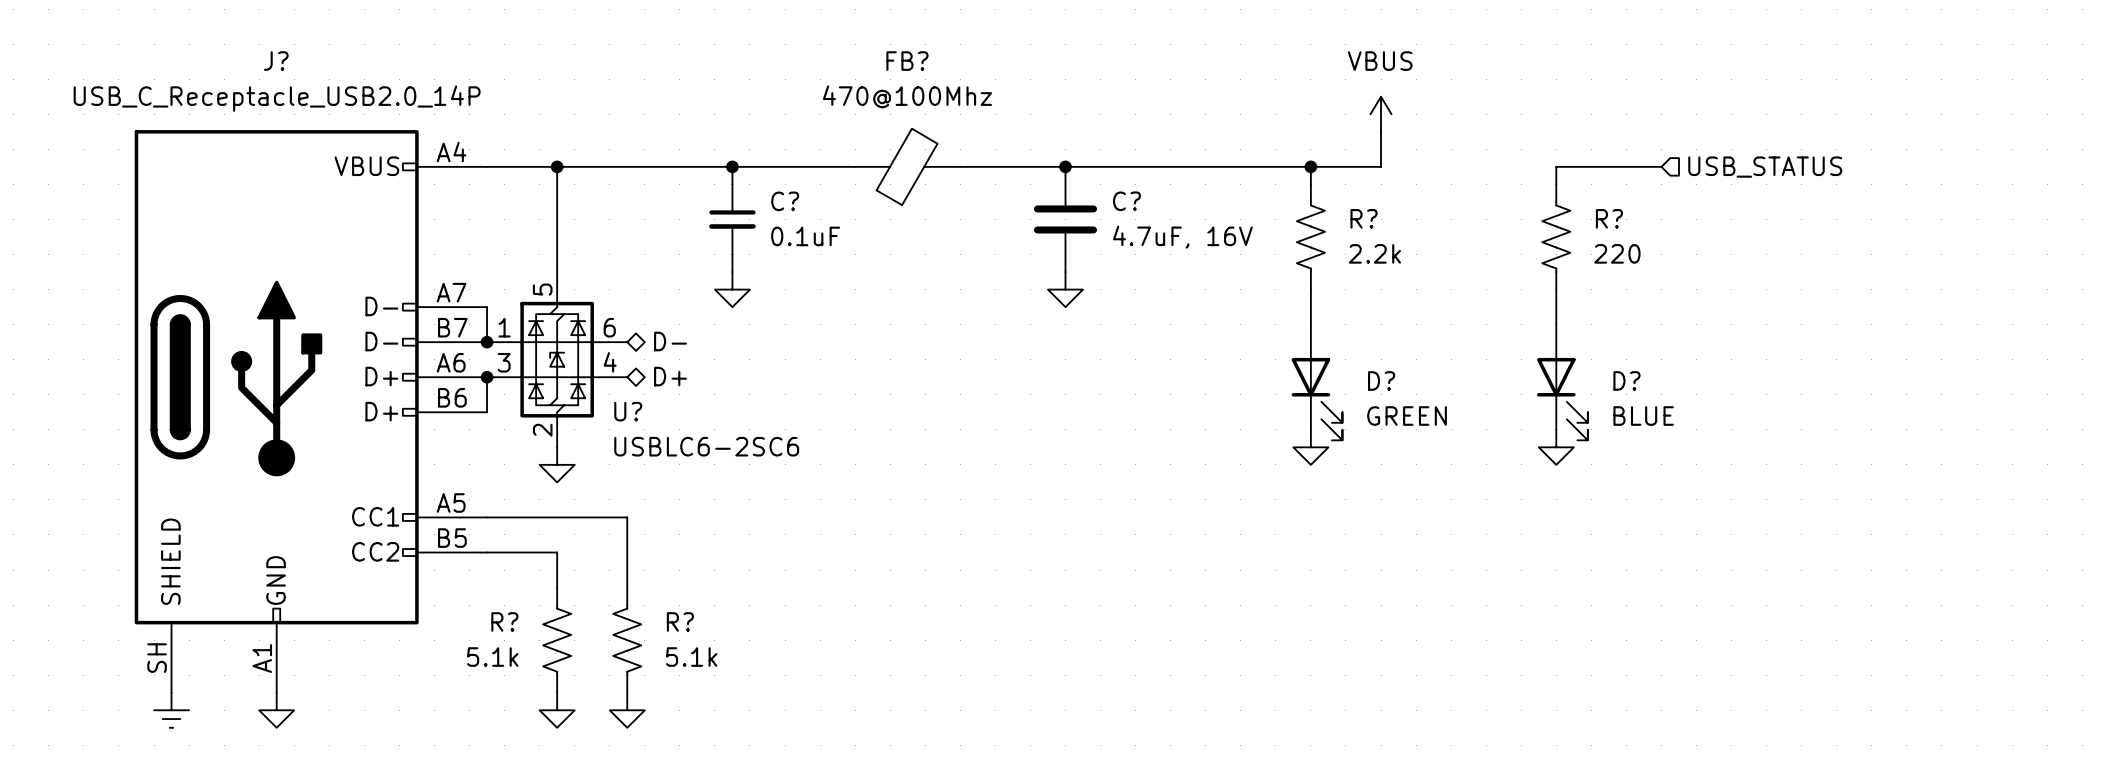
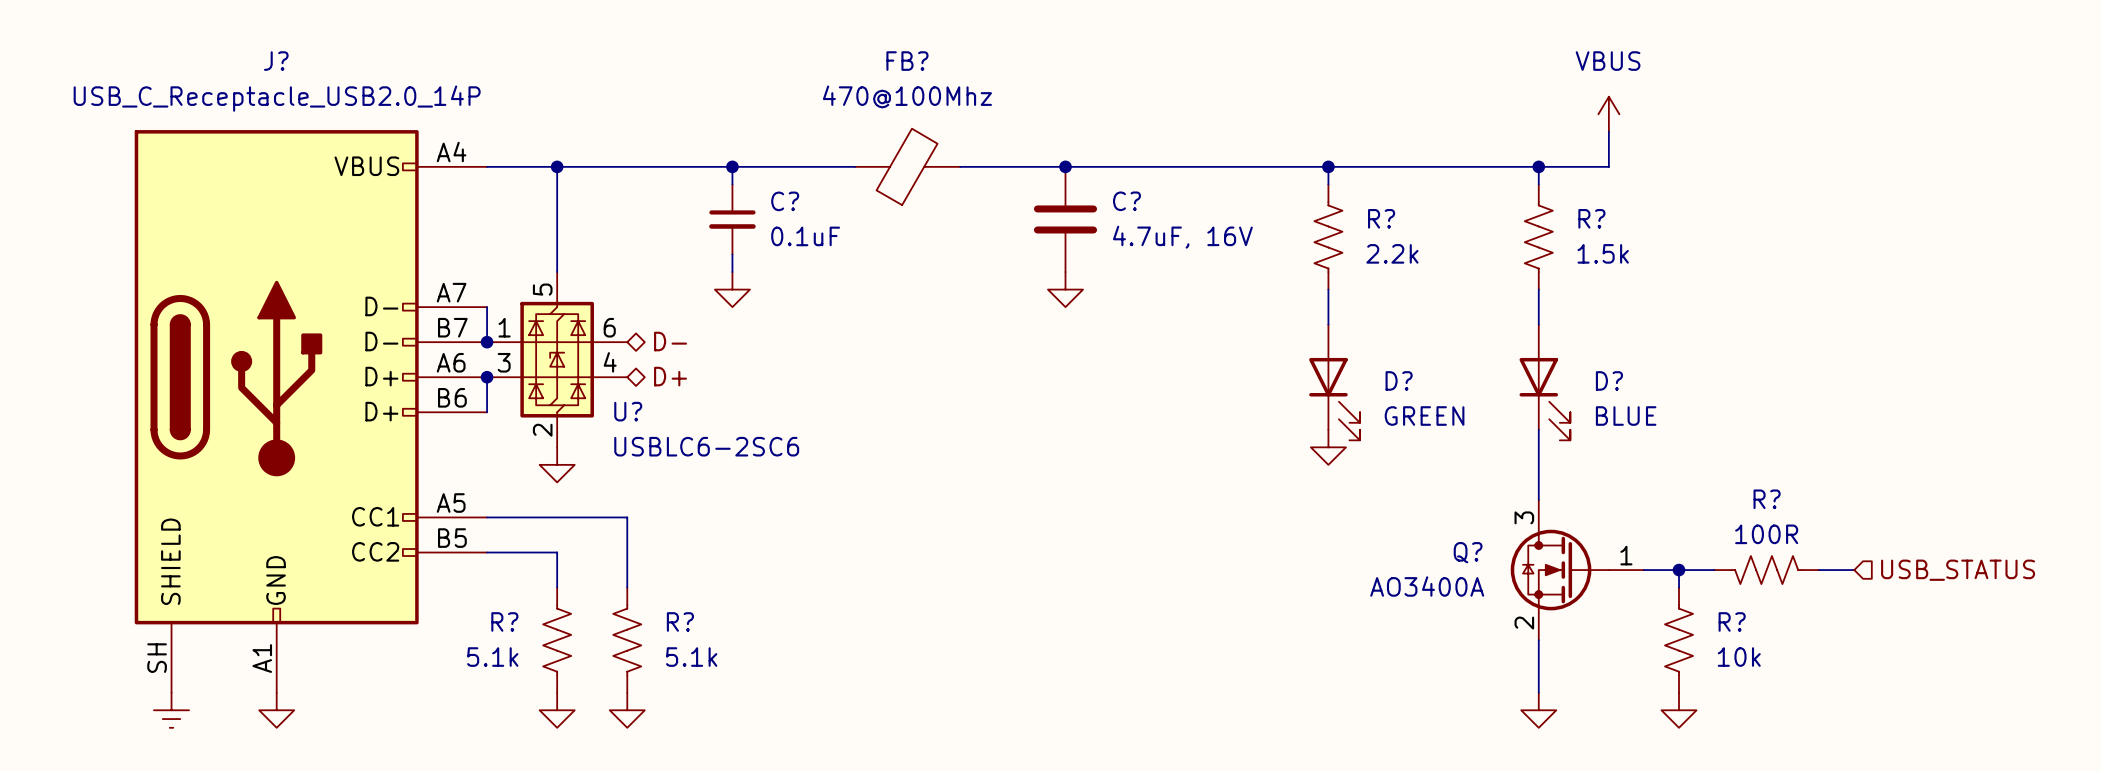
power symbol position: VBUS (1381, 114) -> VBUS (1608, 114)
wire: (1381, 131) (1381, 166) -> none
wire: (1310, 166) (1310, 184) -> (1538, 166) (1538, 184)
junction position: (1310, 166) -> (1328, 166)
wire: none -> (1328, 166) (1328, 184)
junction: none -> (1538, 166)
wire: (1556, 166) (1556, 184) -> (1556, 166) (1381, 166)
wire: (1608, 166) (1661, 166) -> (1608, 166) (1608, 131)
hierarchical label: USB_STATUS (1765, 167) -> none
R? position: (1310, 237) -> (1328, 237)
R?: none -> 1.5k (1538, 237)
R?: 220 (1556, 237) -> none
wire: (1310, 289) (1310, 324) -> (1538, 289) (1538, 324)
wire: (1556, 289) (1556, 324) -> (1328, 289) (1328, 324)
D? position: (1317, 382) -> (1334, 382)
D? position: (1562, 382) -> (1544, 382)
wire: none -> (1538, 429) (1538, 499)
power symbol position: (1310, 447) -> (1328, 447)
power symbol: (1556, 447) -> none
Q?: none -> AO3400A (1577, 570)
wire: none -> (1643, 570) (1714, 570)
wire: none -> (1679, 570) (1679, 587)
junction: none -> (1679, 570)
R?: none -> 100R (1766, 570)
wire: none -> (1819, 570) (1854, 570)
hierarchical label: none -> USB_STATUS (1958, 570)
wire: none -> (1538, 640) (1538, 692)
R?: none -> 10k (1679, 640)
power symbol: none -> (1538, 710)
power symbol: none -> (1679, 710)

